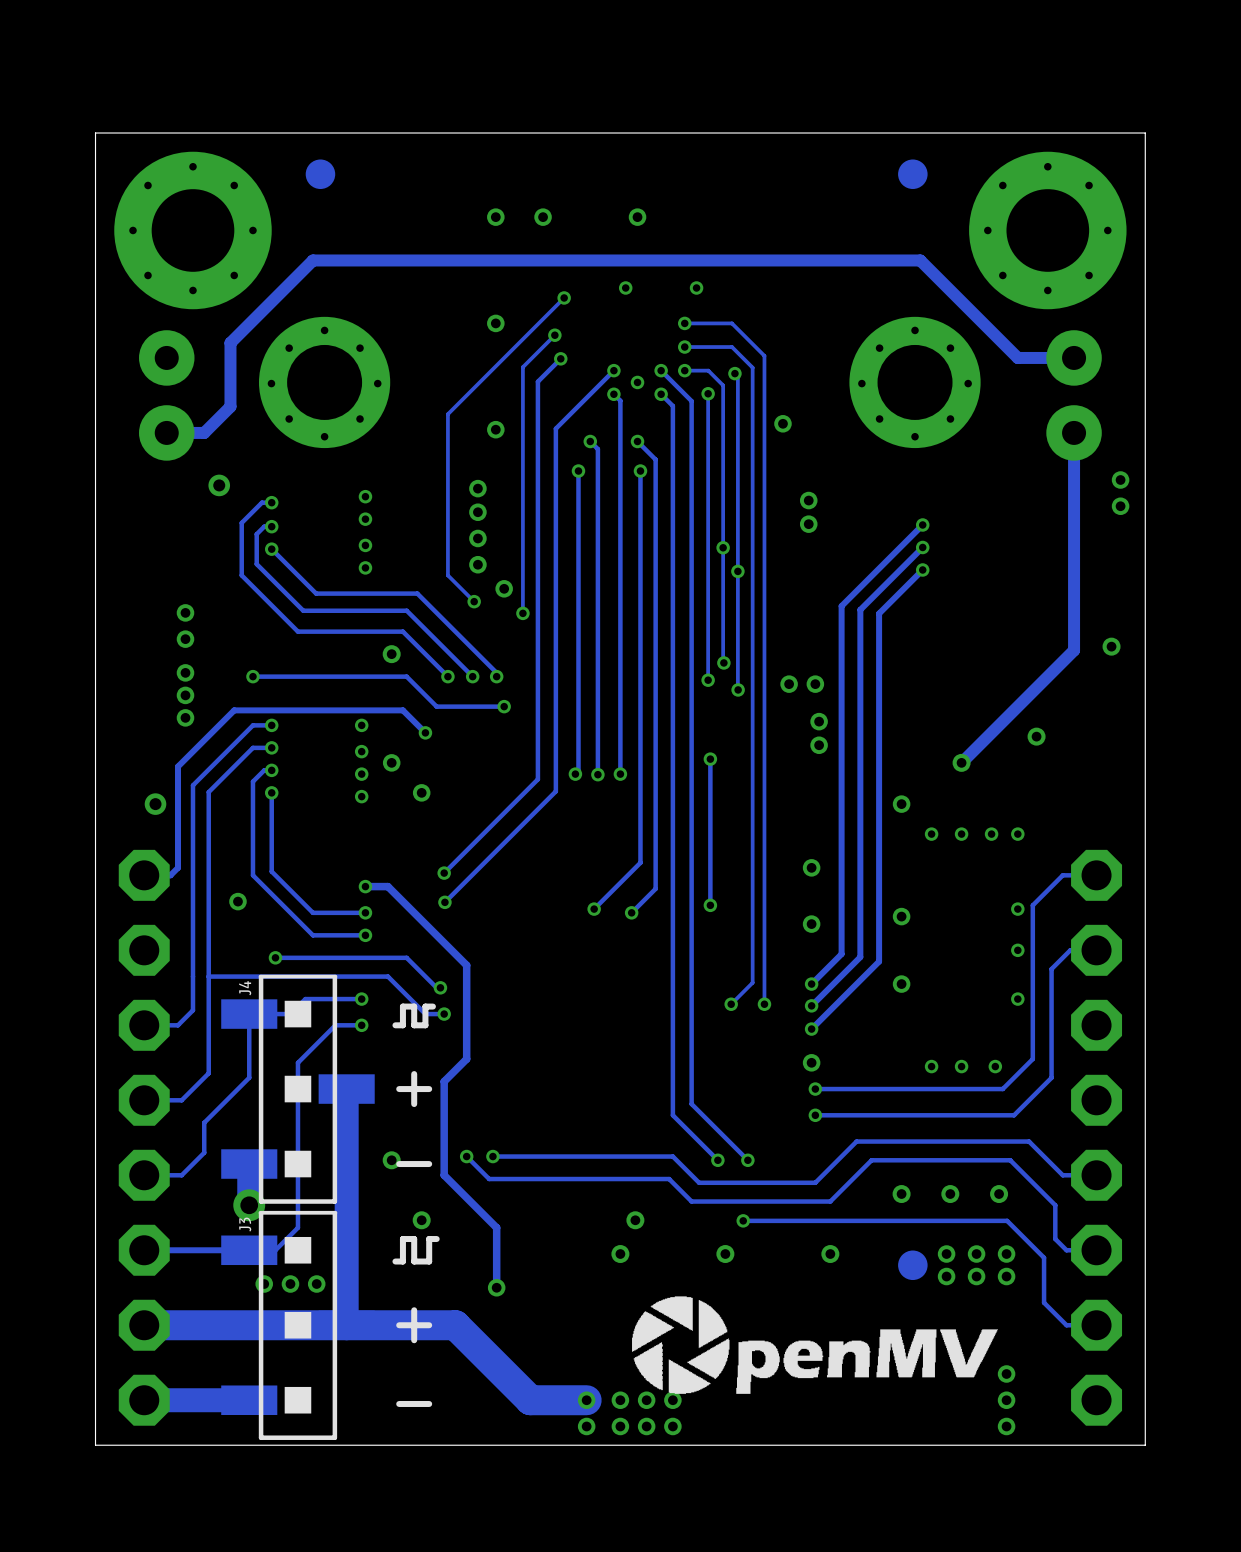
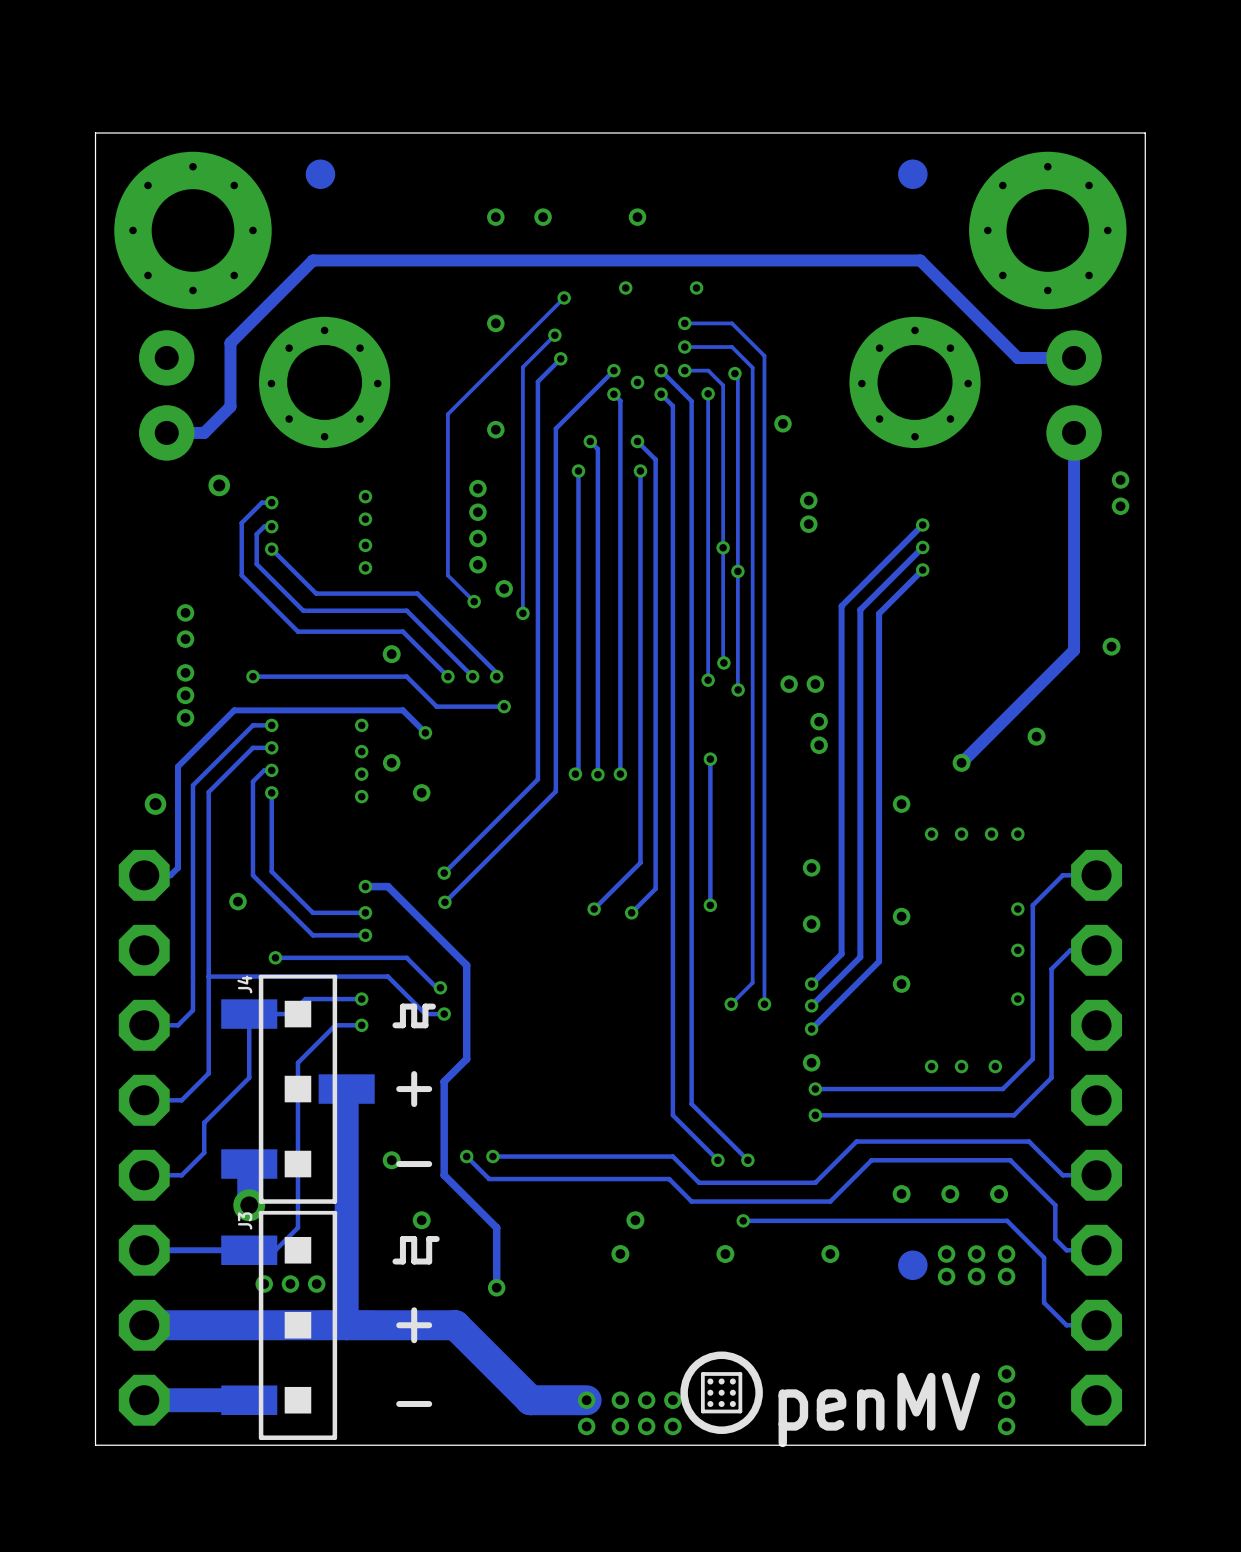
drawing: [632, 1296, 998, 1394] -> none
drawing: none -> [680, 1351, 763, 1434]
line: none -> (740, 1373) (740, 1411) (702, 1411) (702, 1373) (740, 1373)
text: none -> penMV (879, 1409)

